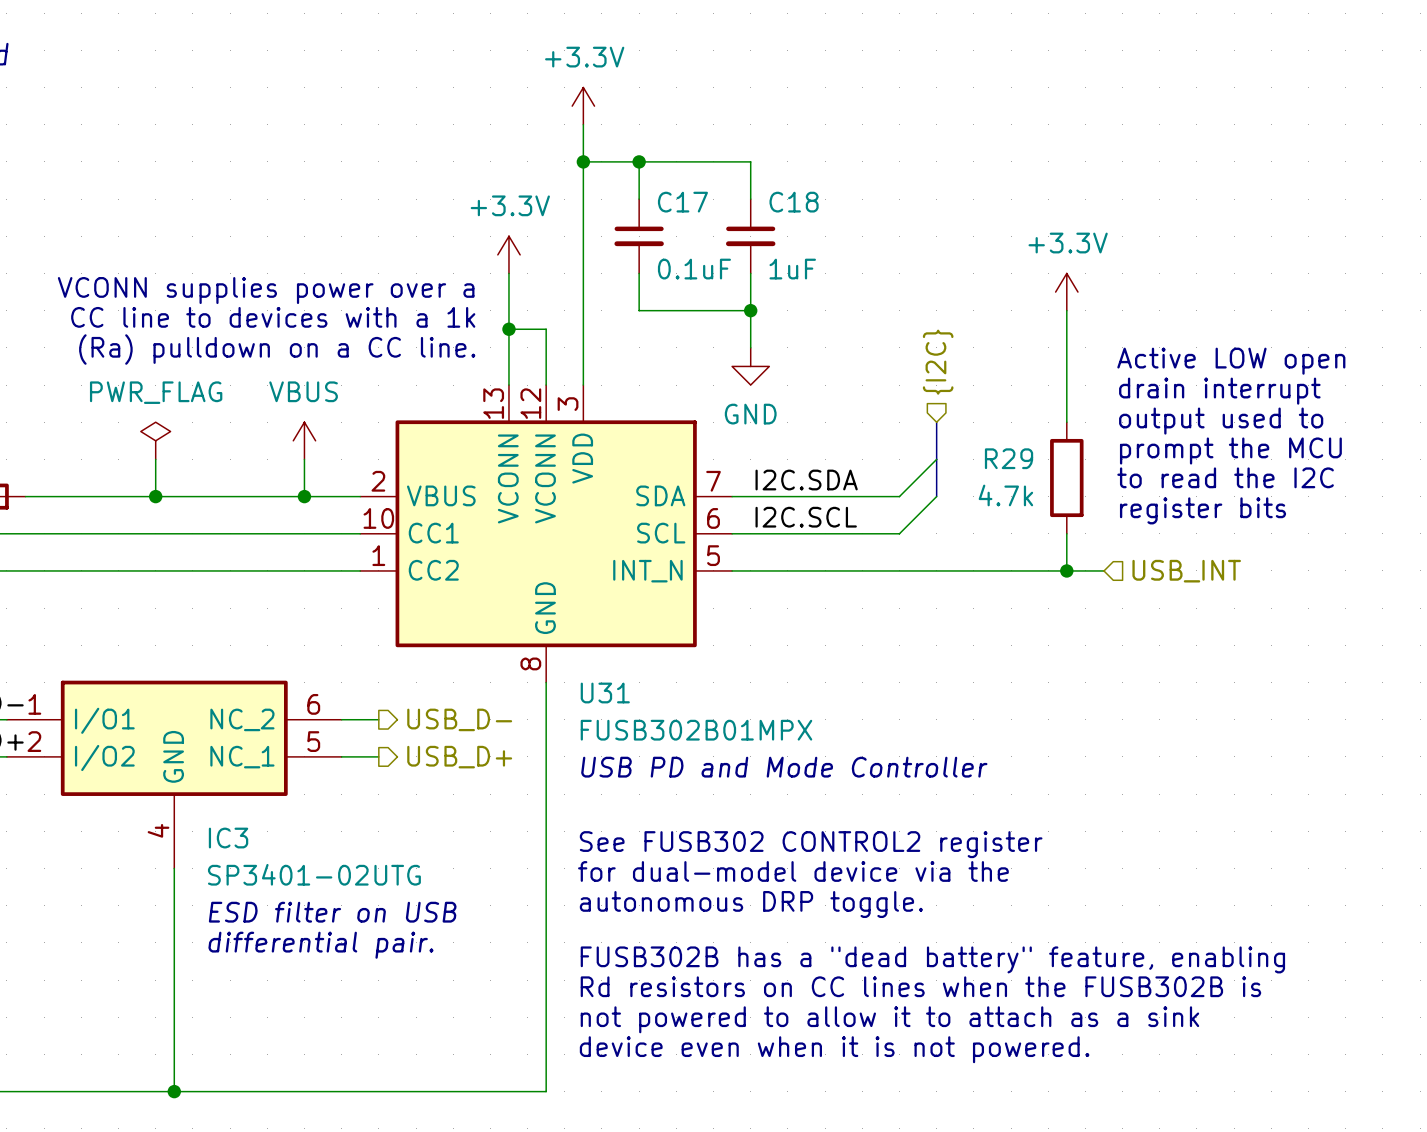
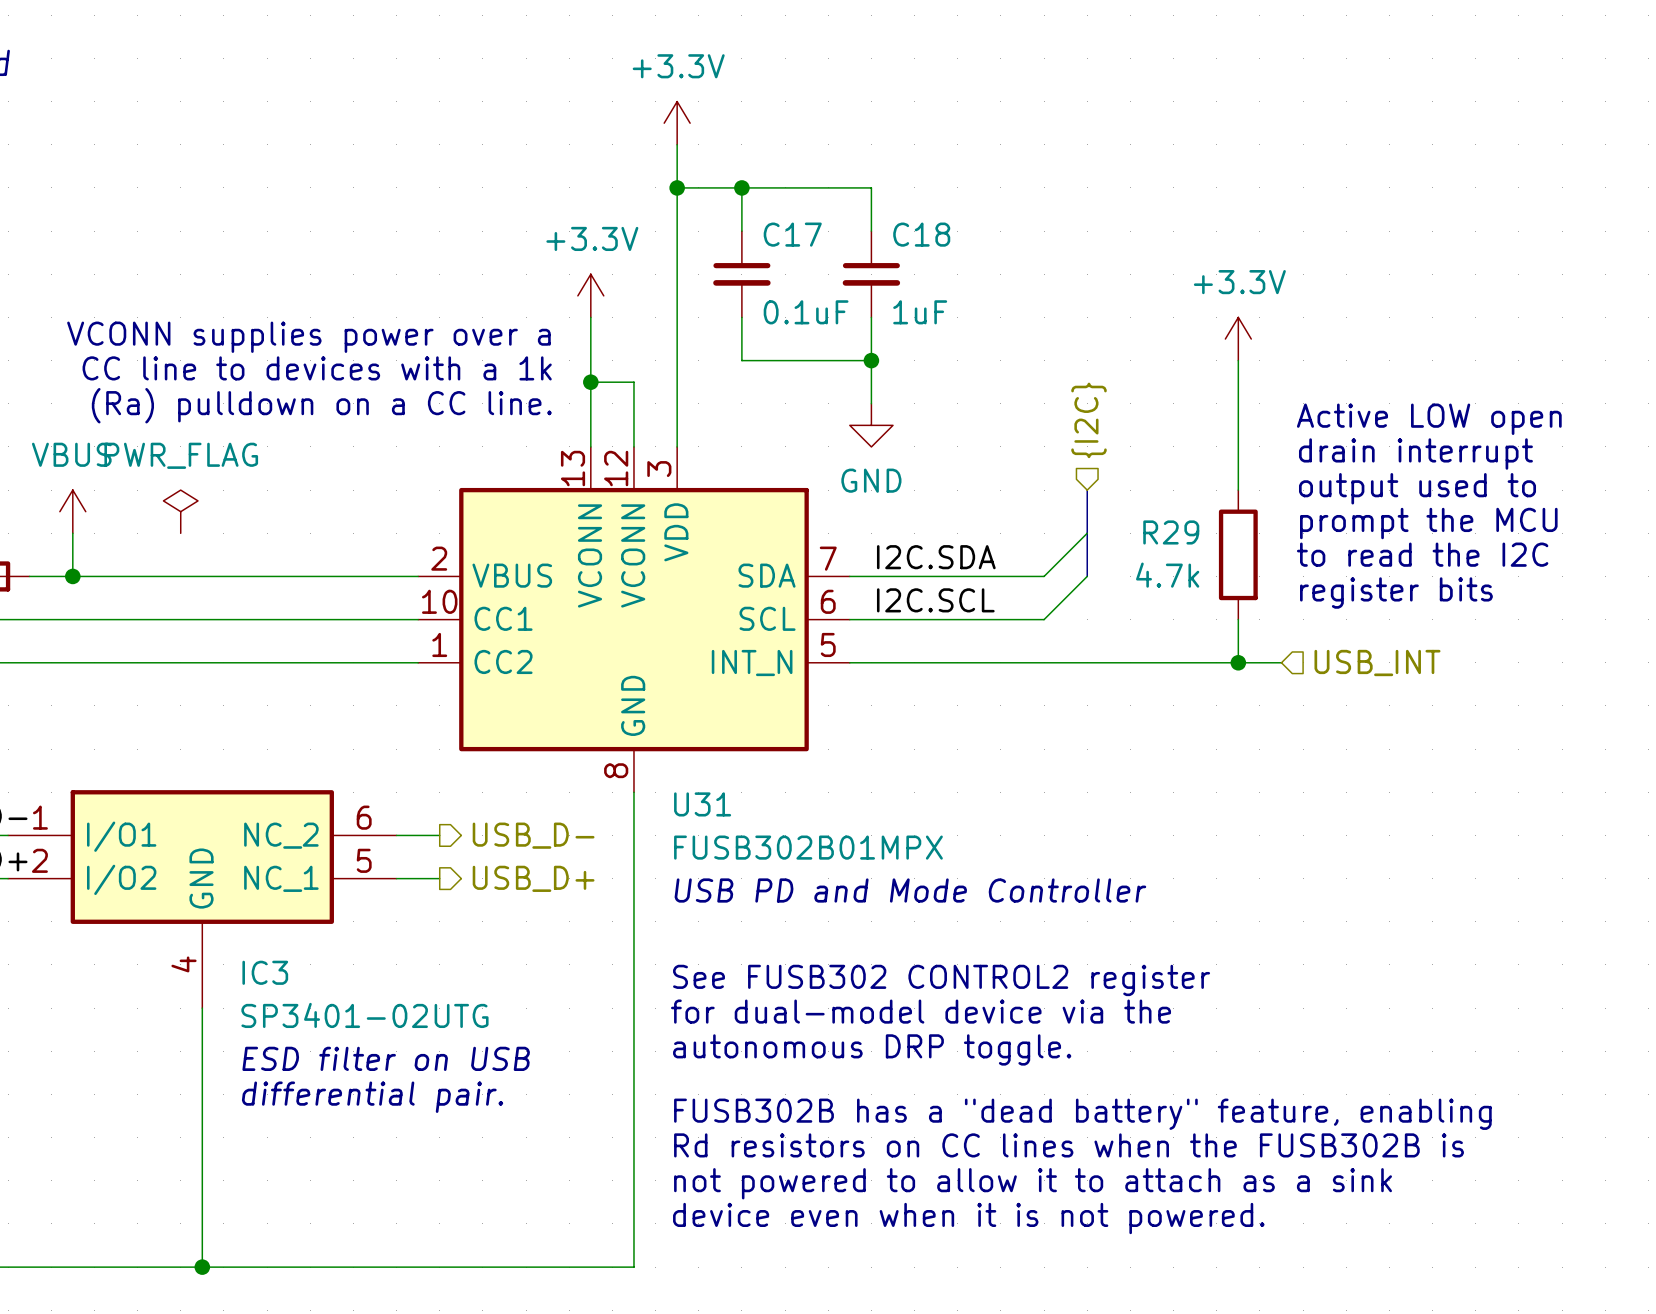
power symbol position: VBUS (304, 440) -> VBUS (72, 511)
wire: (155, 459) (155, 496) -> (72, 533) (72, 576)
wire: (304, 459) (304, 496) -> none
junction: none -> (72, 576)
junction: (155, 496) -> none
junction: (304, 496) -> none

